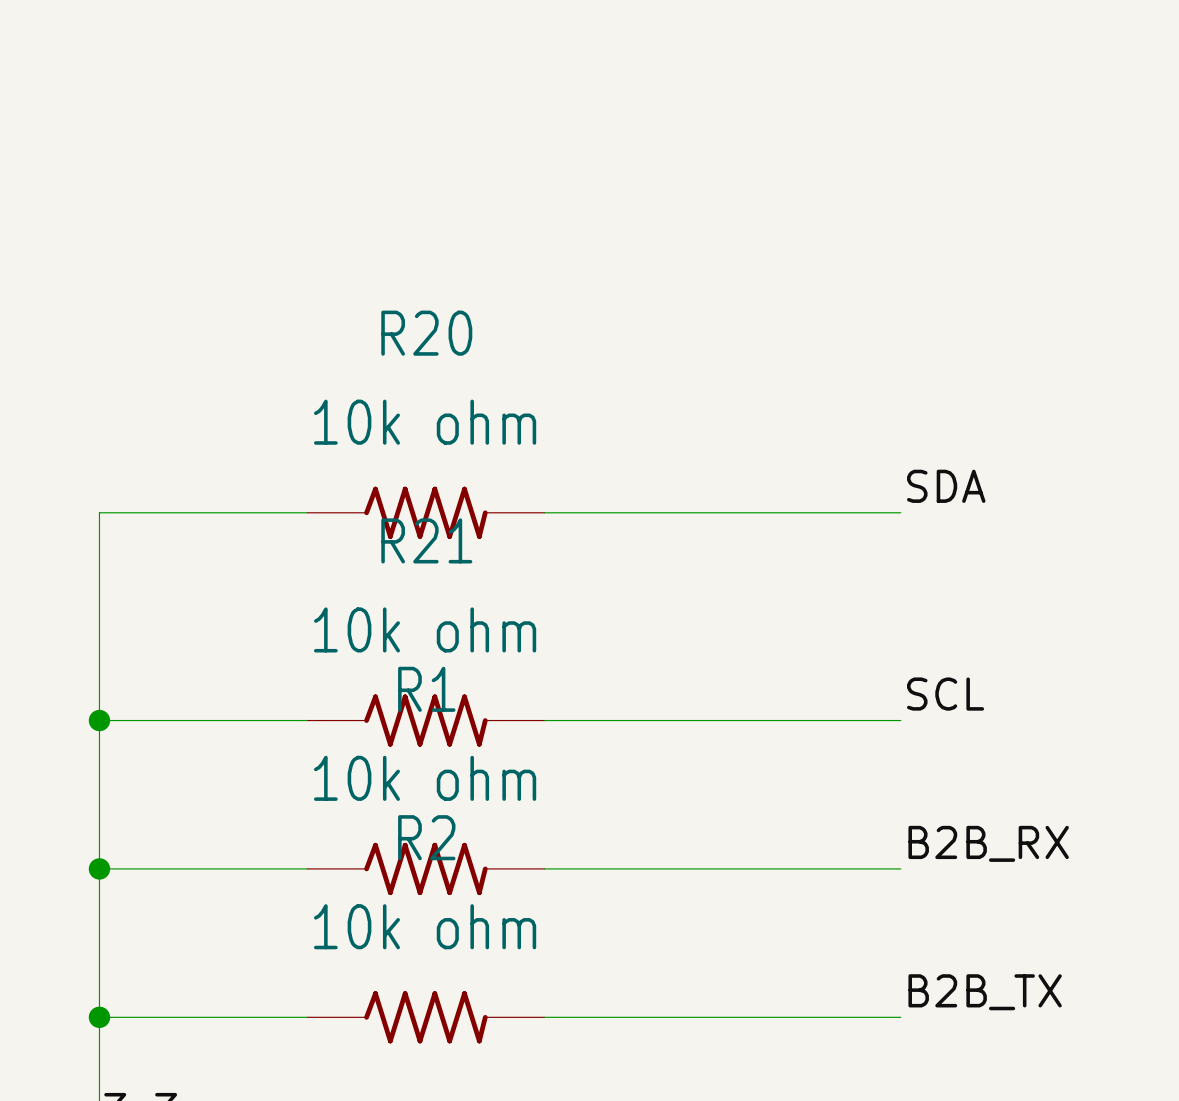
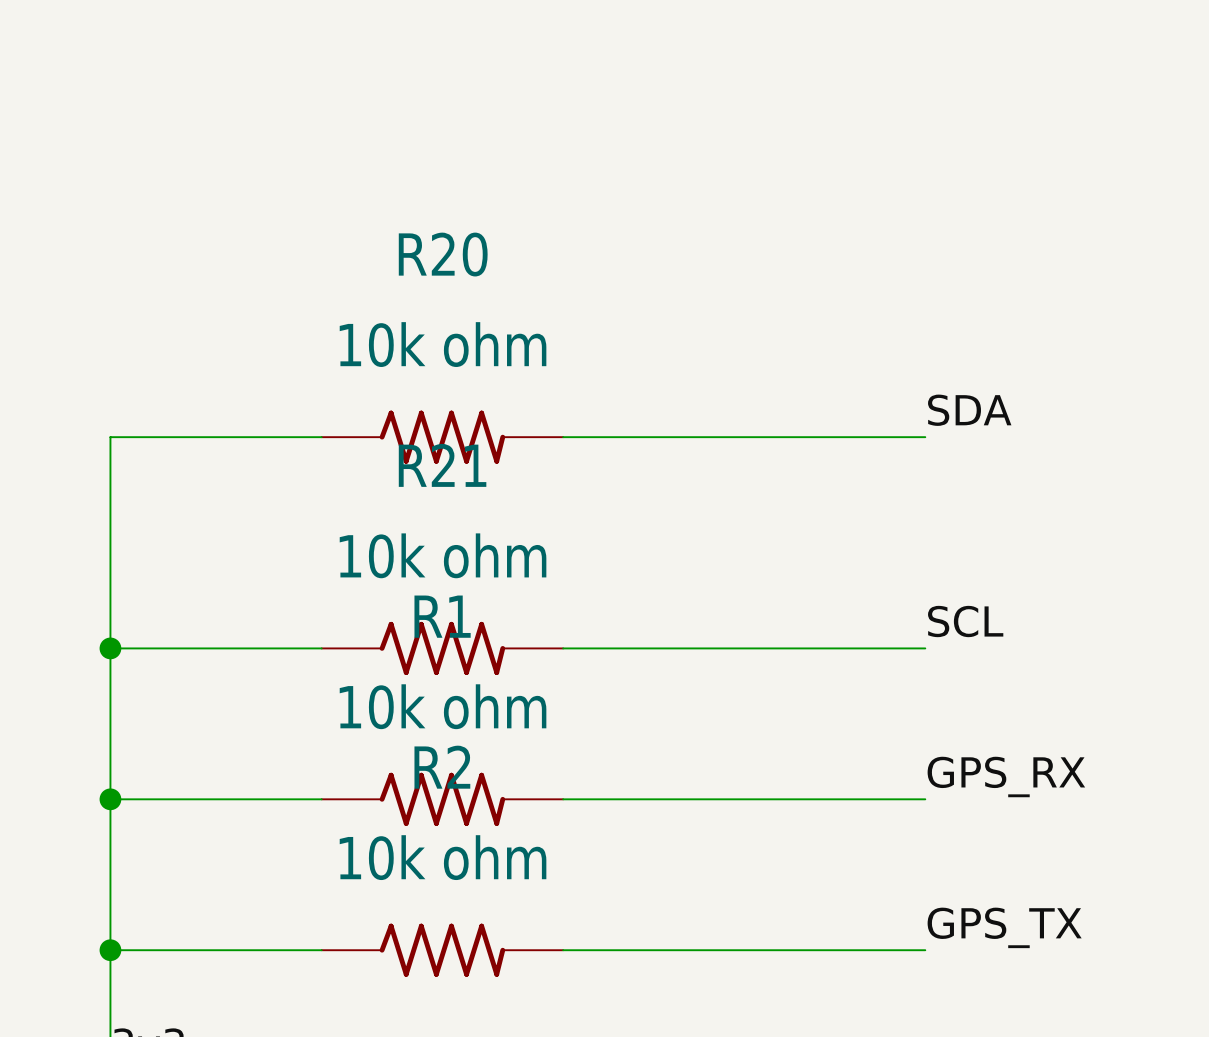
label: B2B_RX (988, 843) -> GPS_RX (1006, 776)
label: B2B_TX (985, 992) -> GPS_TX (1004, 927)

